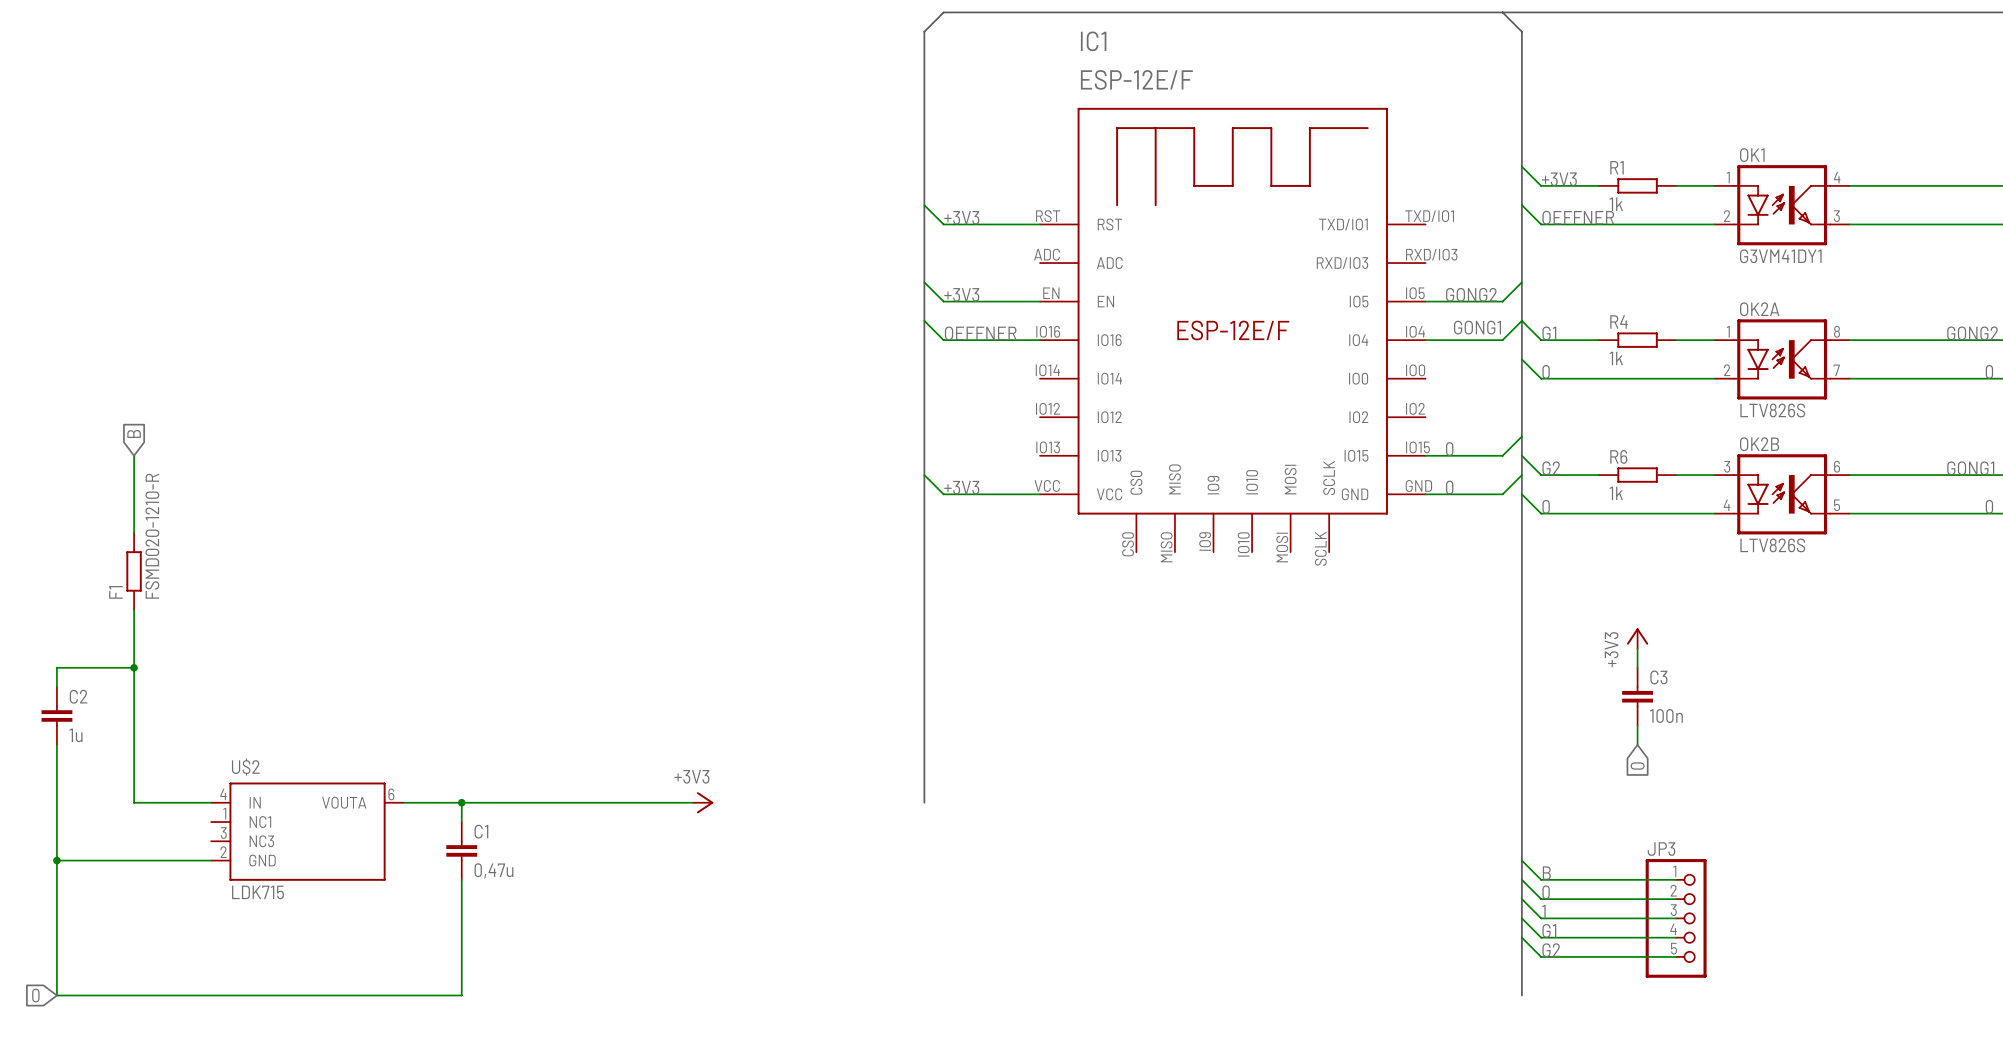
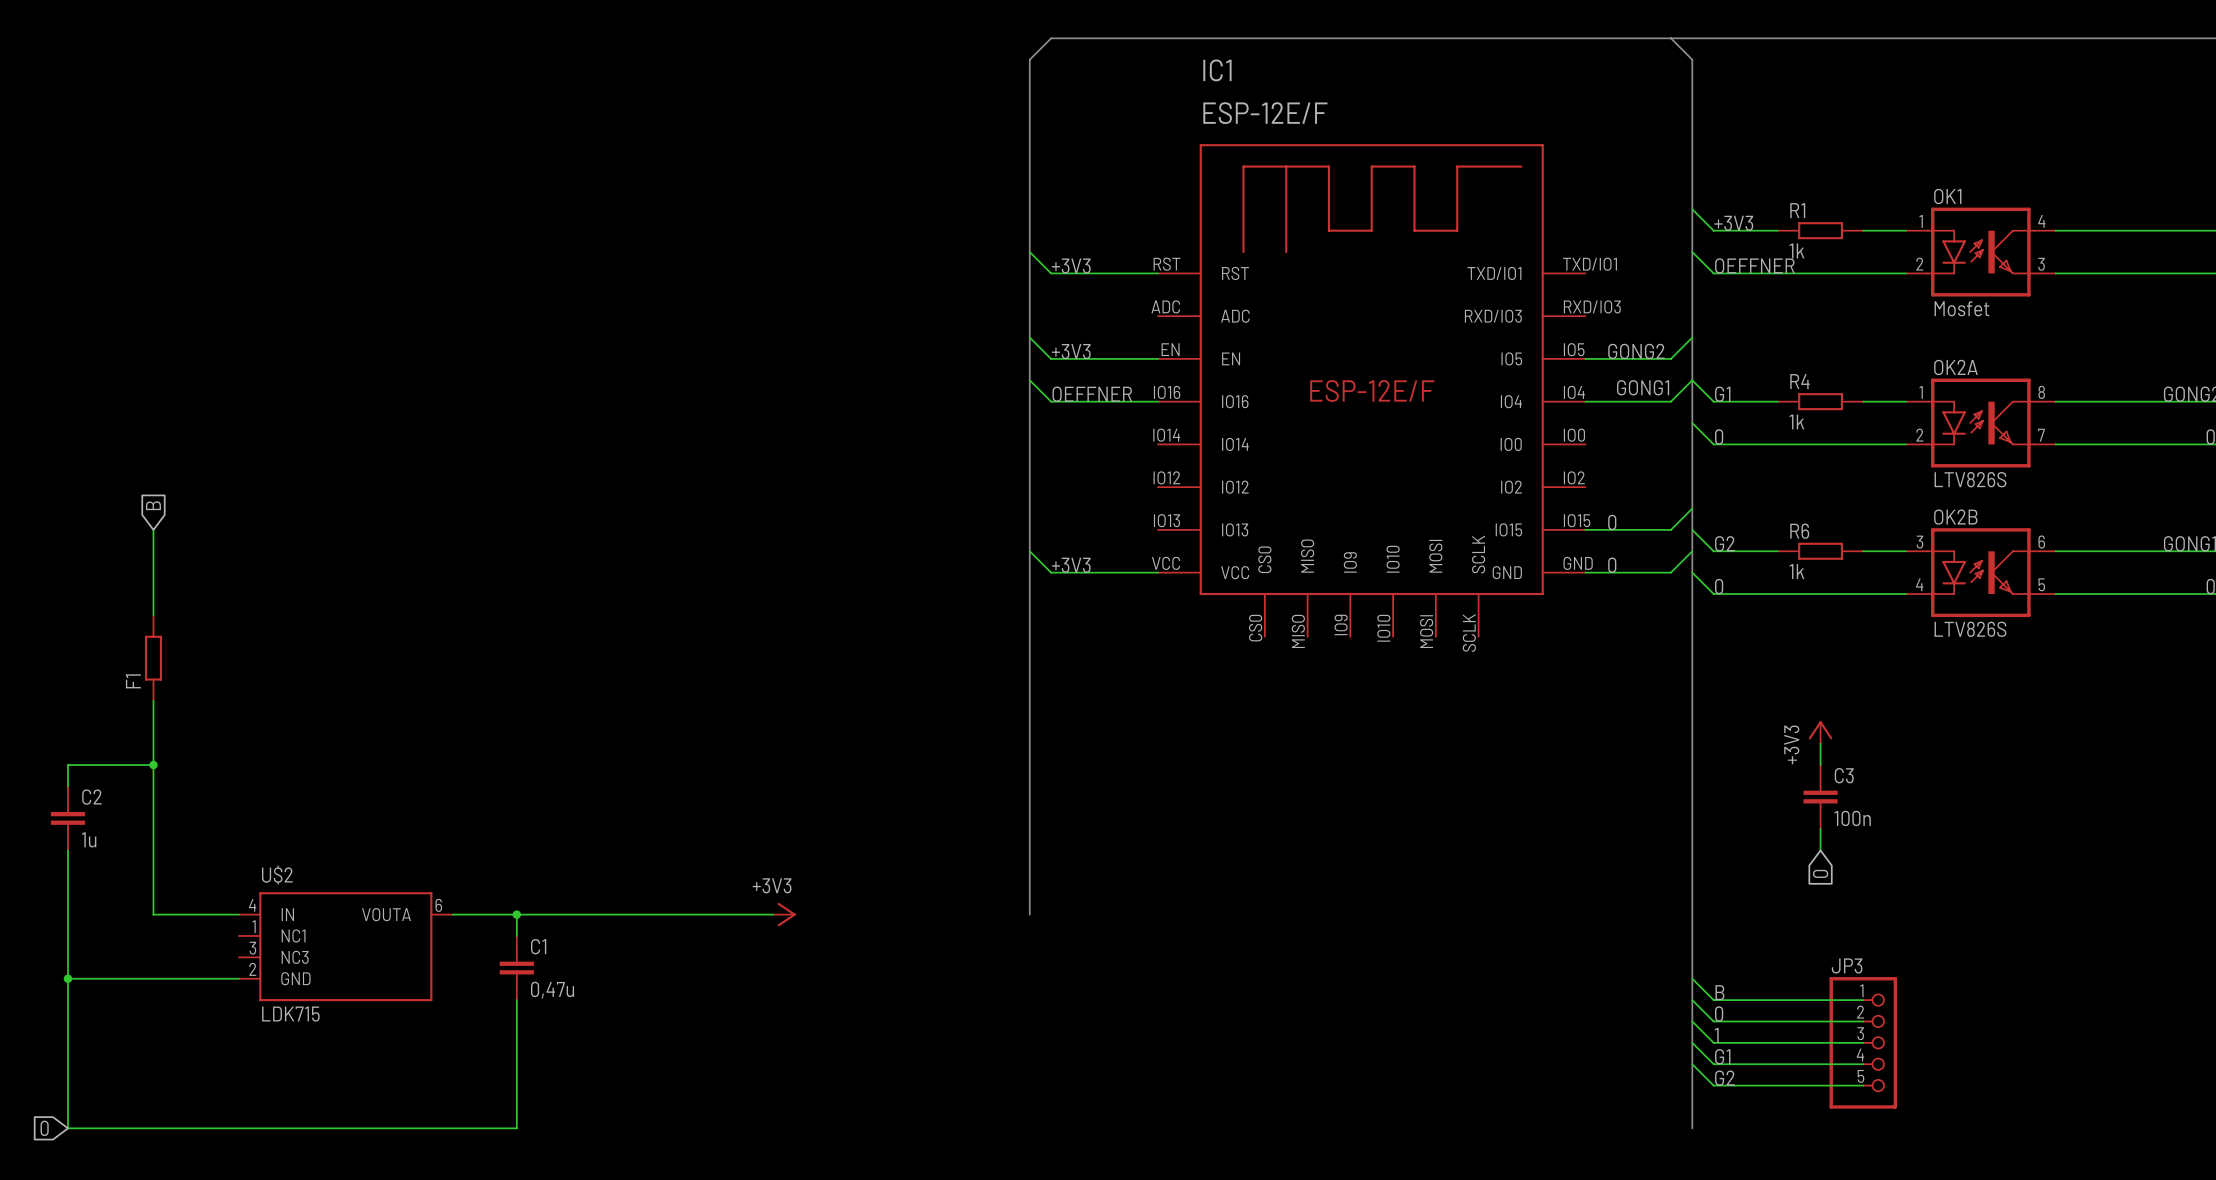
OK1 value: G3VM41DY1 (1780, 256) -> Mosfet (1961, 308)
F1 value: FSMD020-1210-R (152, 536) -> none

